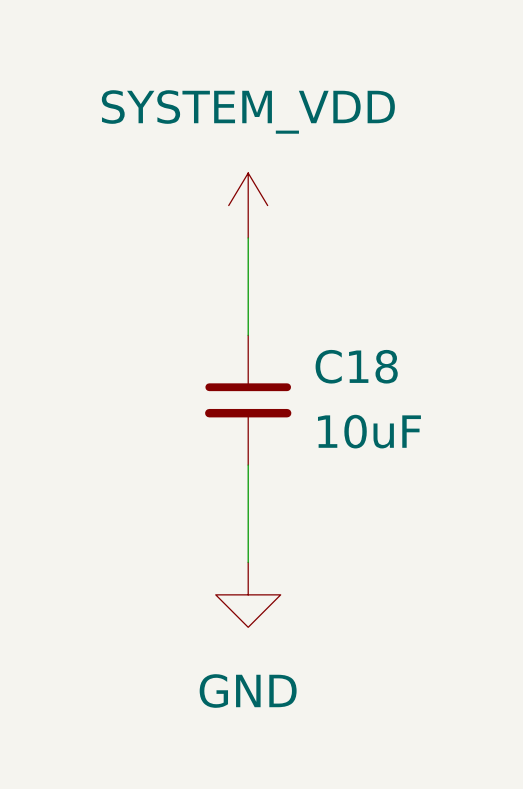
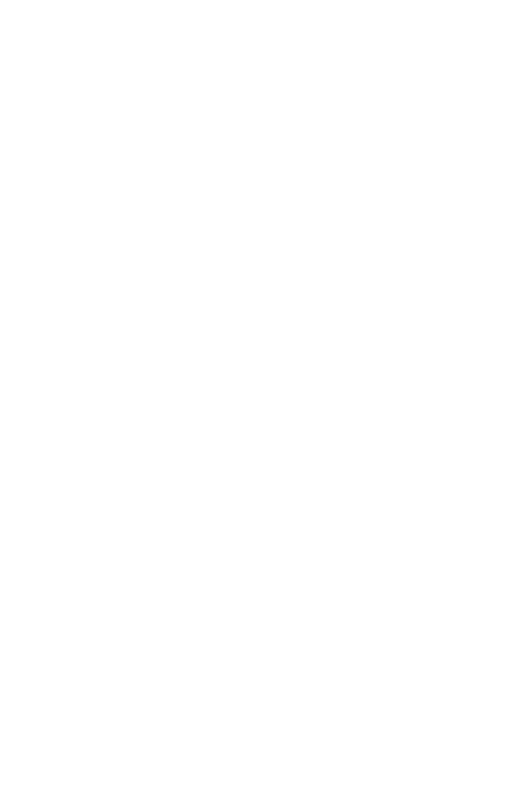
power symbol: SYSTEM_VDD (248, 205) -> none
wire: (248, 237) (248, 335) -> none
C18: 10uF (248, 400) -> none
wire: (248, 465) (248, 562) -> none
power symbol: GND (248, 594) -> none

